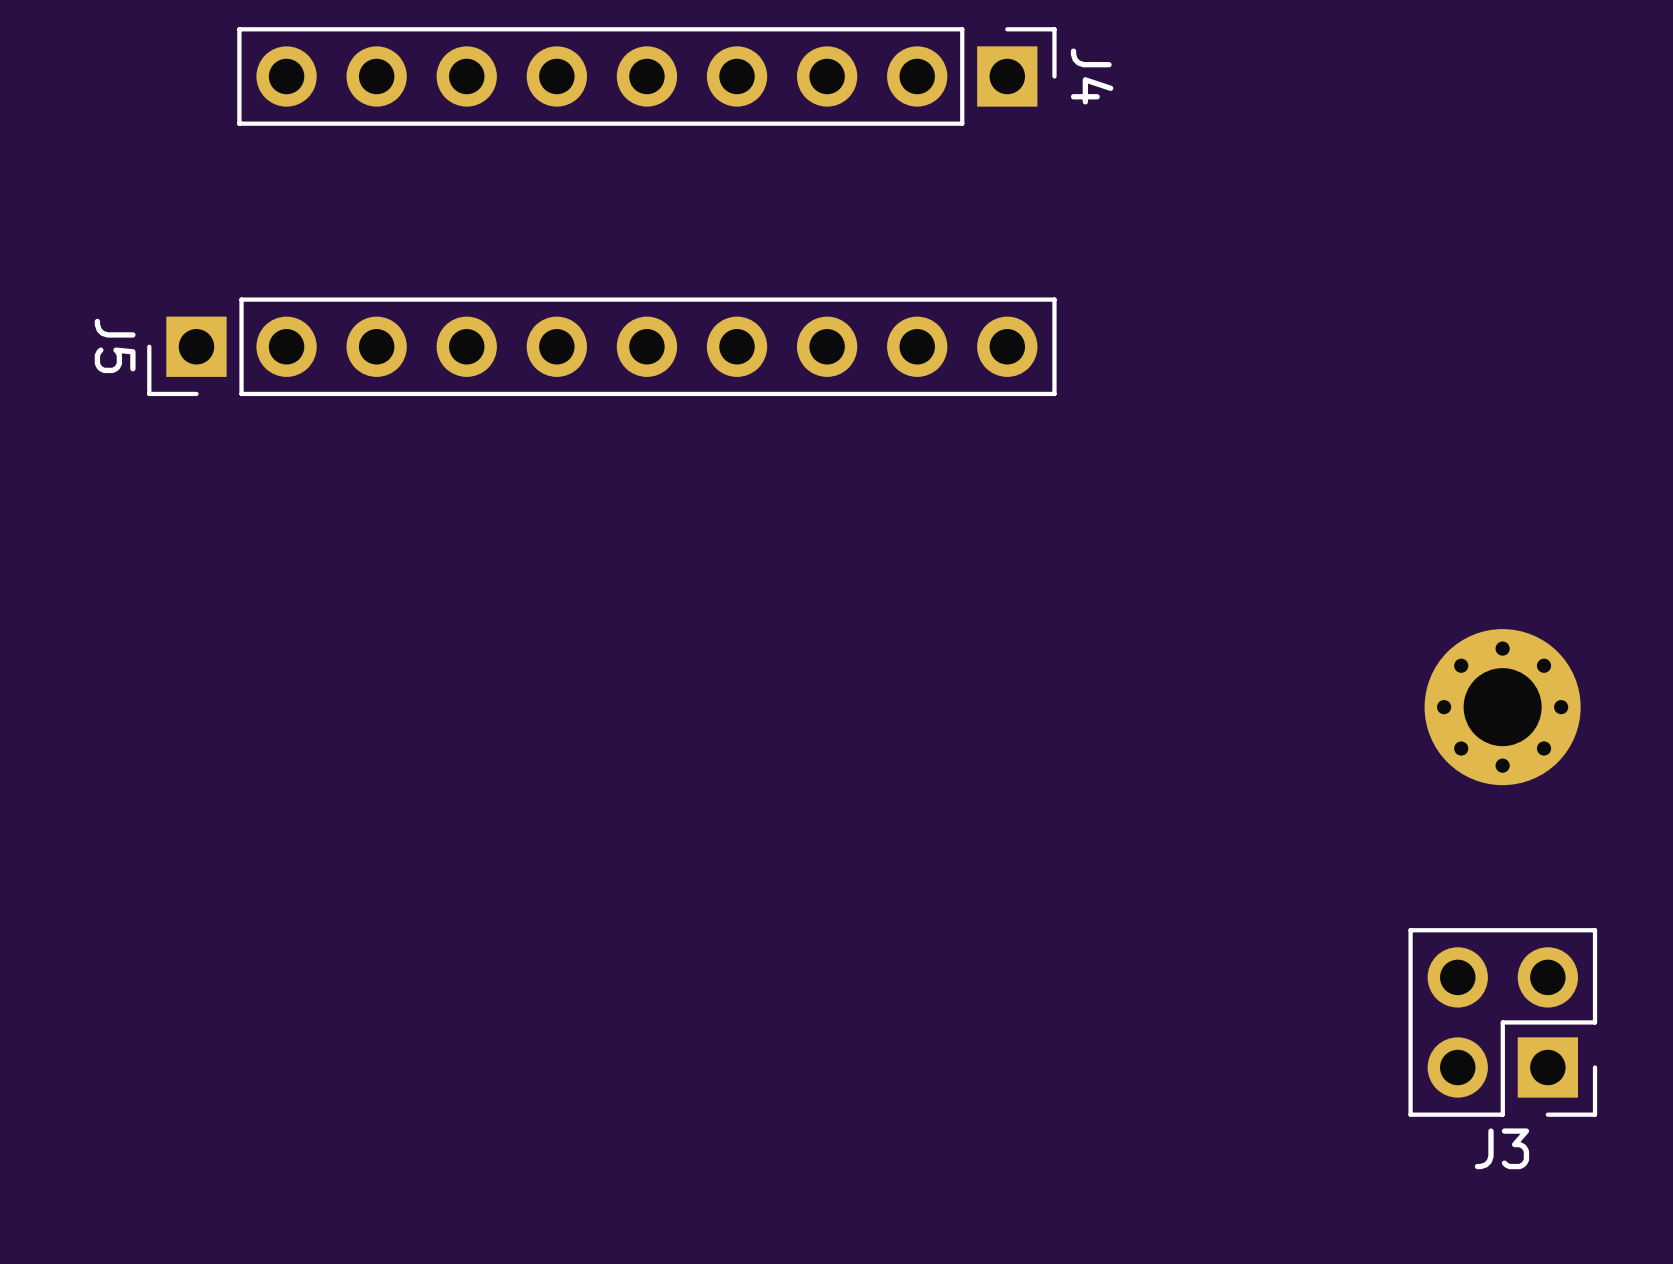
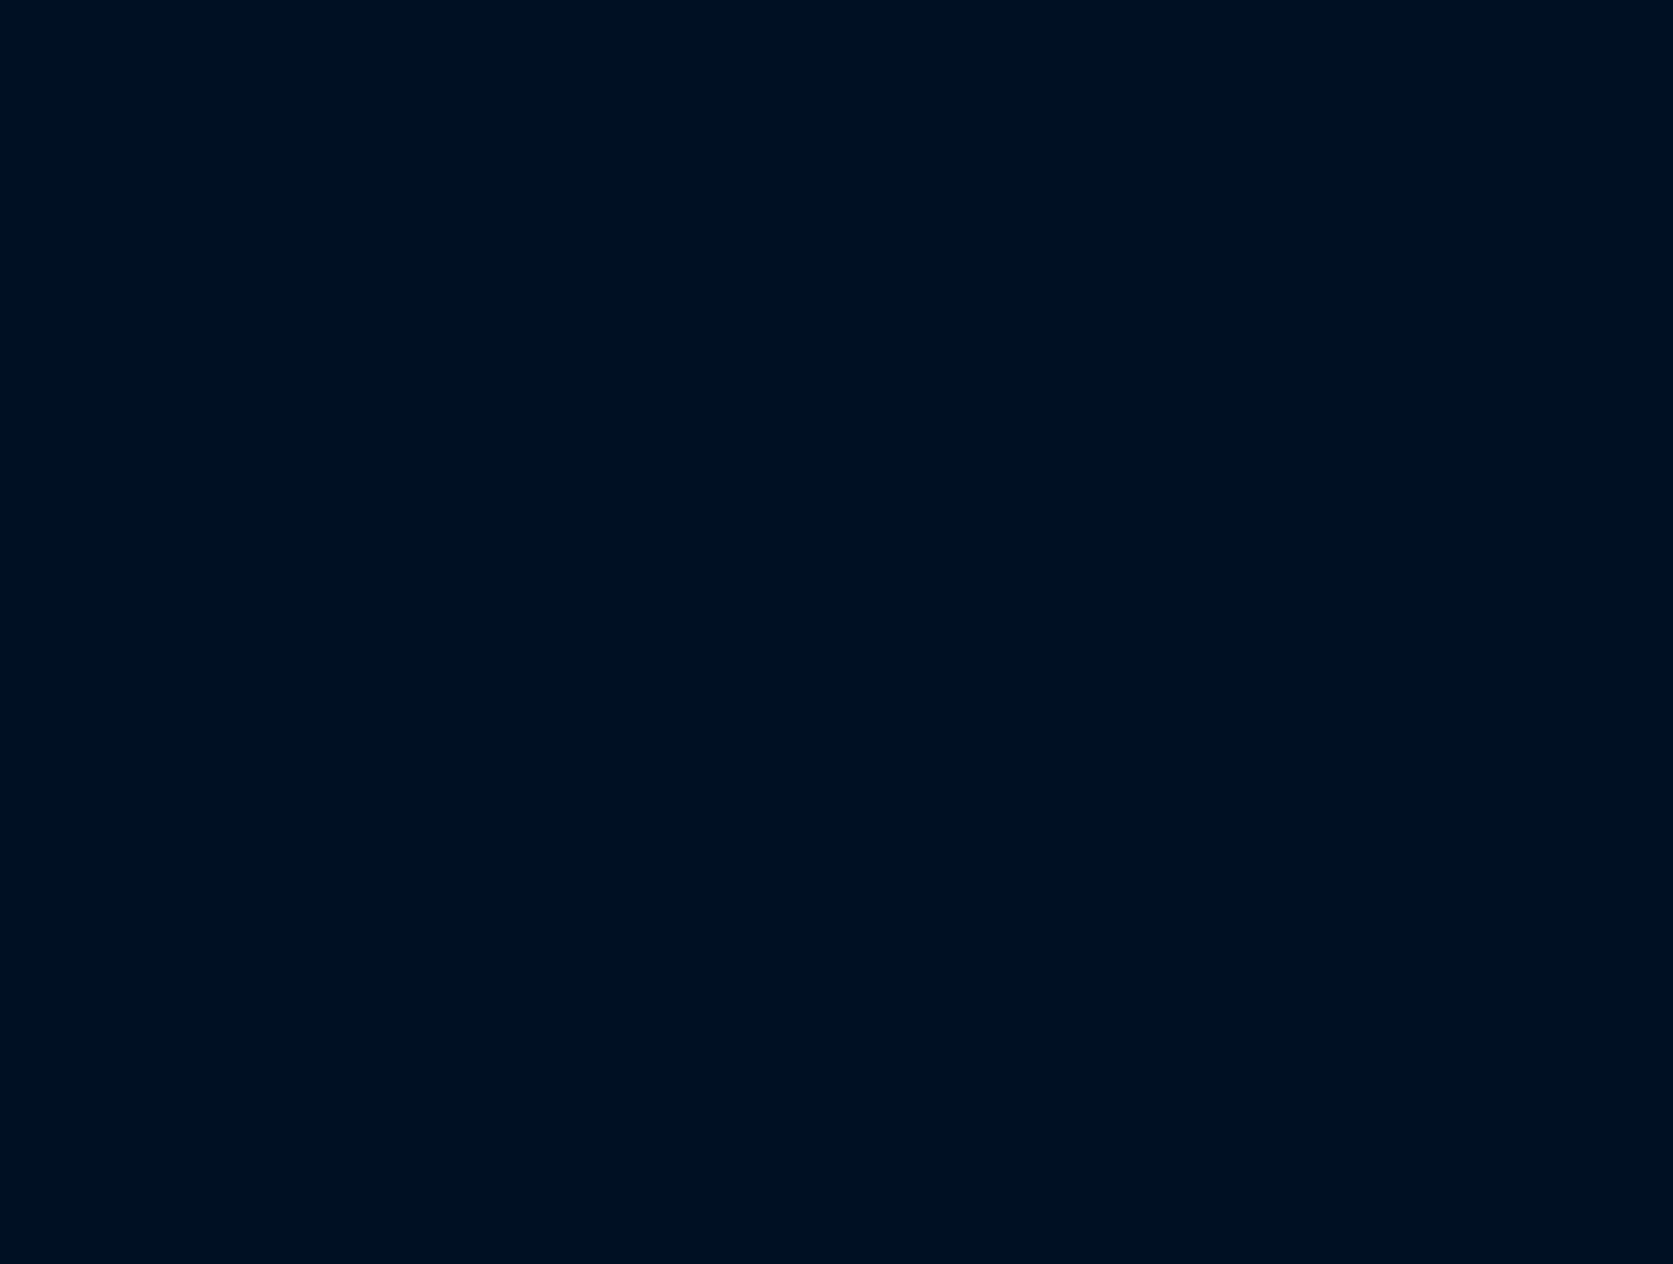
J4: (646, 76) -> none
J5: (601, 346) -> none
part: (1502, 707) -> none
J3: (1502, 1022) -> none

